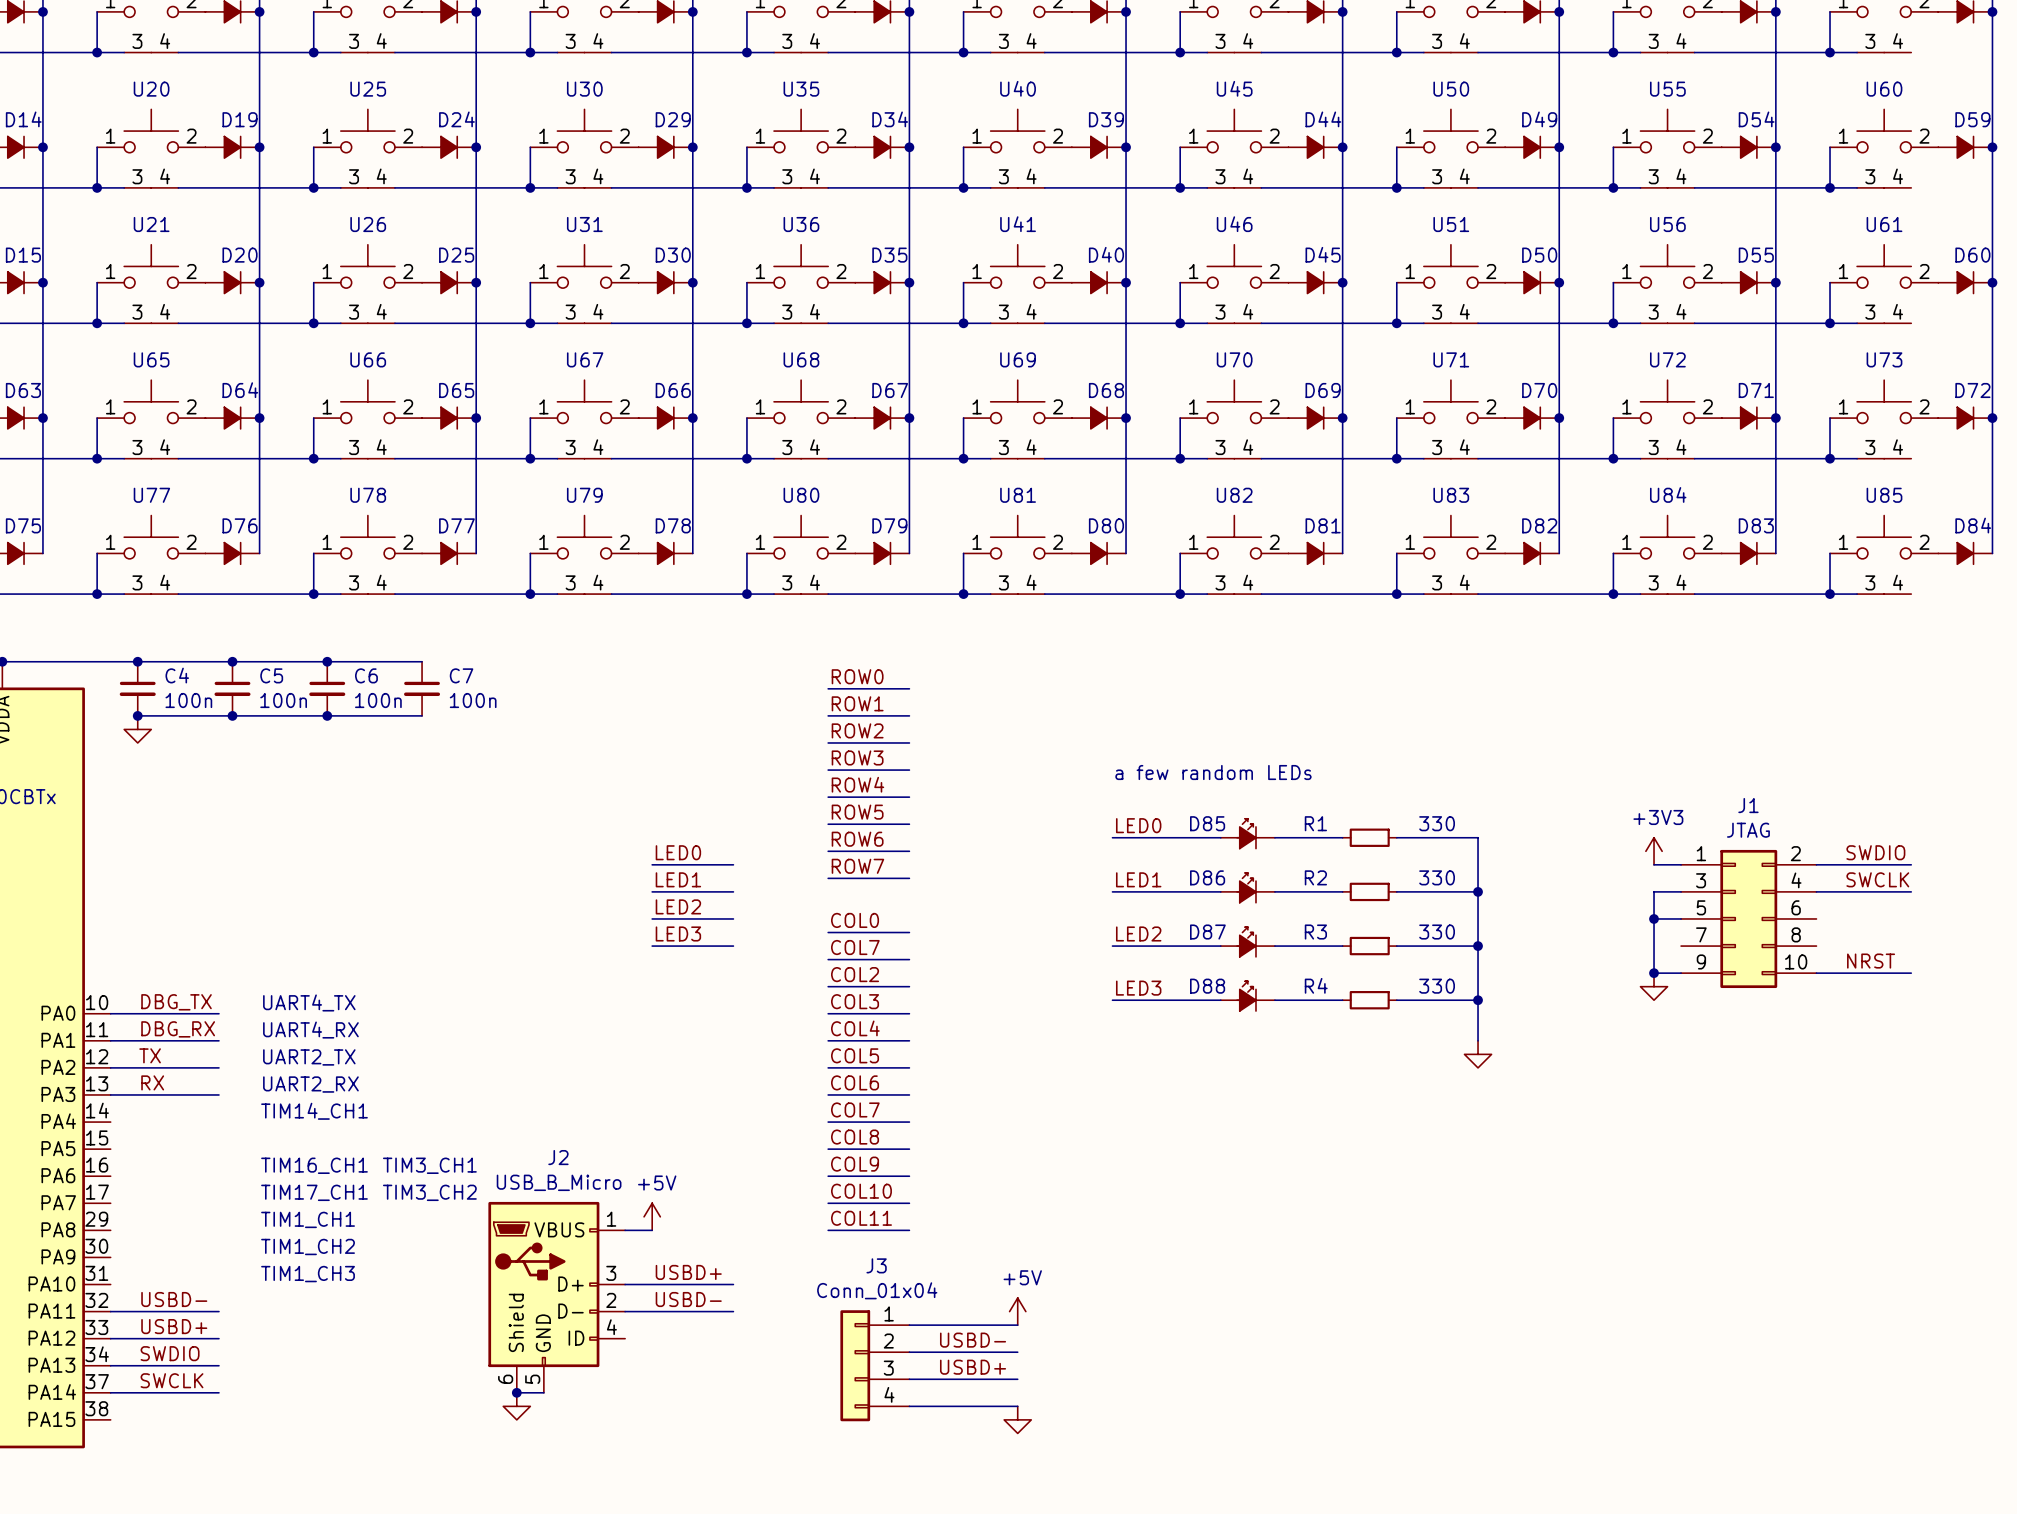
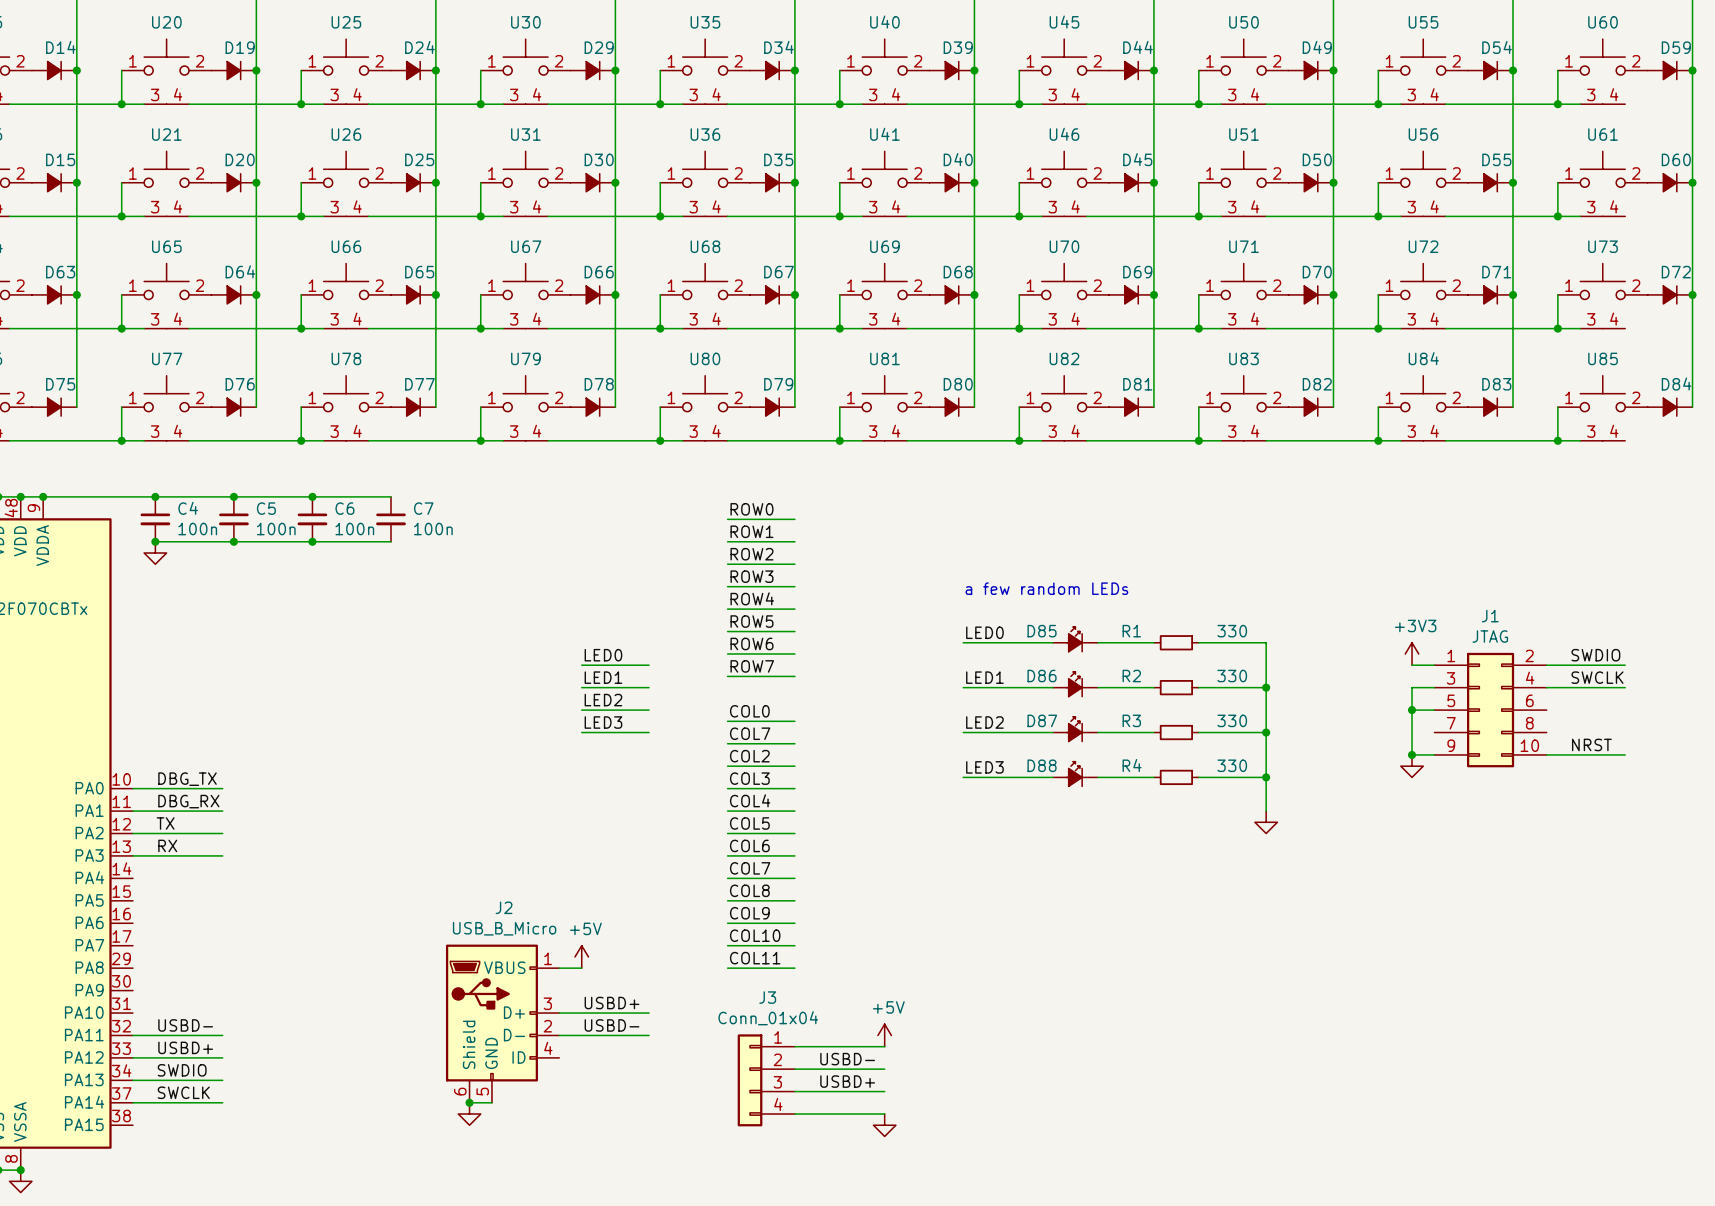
text: UART4_TX (309, 1002) -> none
text: UART4_RX (310, 1030) -> none
text: UART2_TX (309, 1057) -> none
text: UART2_RX (310, 1084) -> none
text: TIM14_CH1 (314, 1111) -> none
text: TIM16_CH1 (314, 1165) -> none
text: TIM3_CH1 (429, 1165) -> none
text: TIM17_CH1 (314, 1192) -> none
text: TIM3_CH2 (429, 1192) -> none
text: TIM1_CH1 (308, 1219) -> none
text: TIM1_CH2 (308, 1246) -> none
text: TIM1_CH3 (308, 1274) -> none

